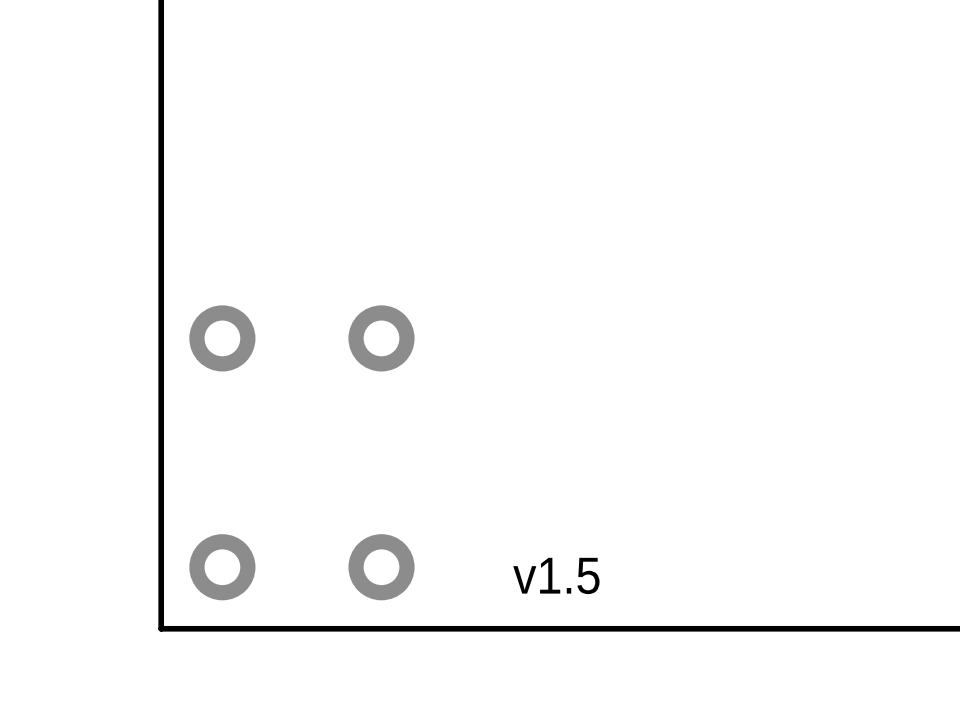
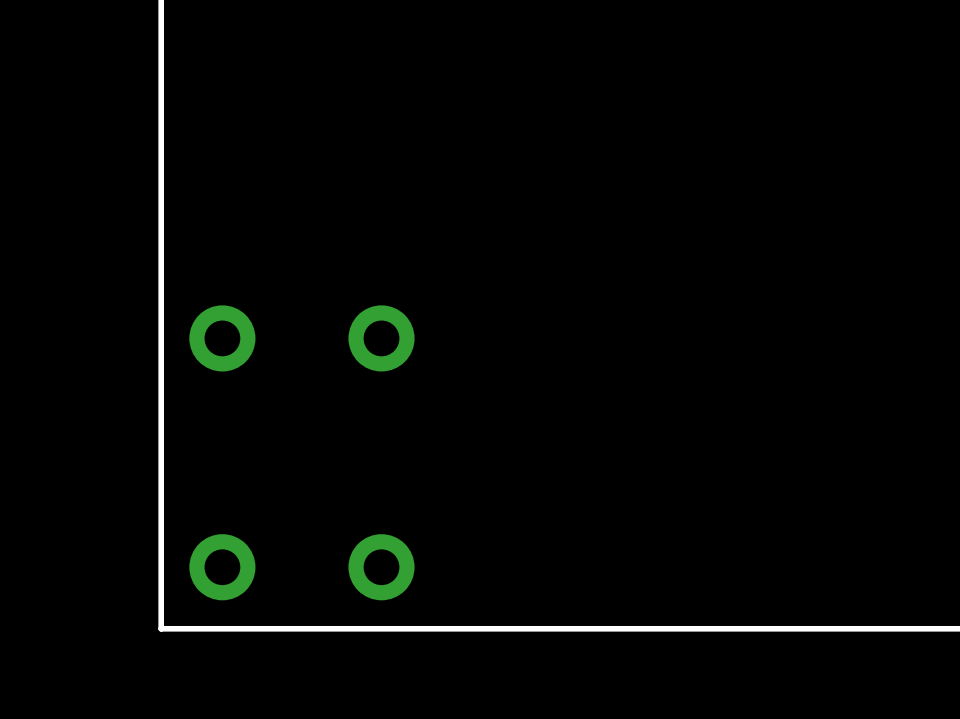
text: v1.5 (556, 575) -> none

